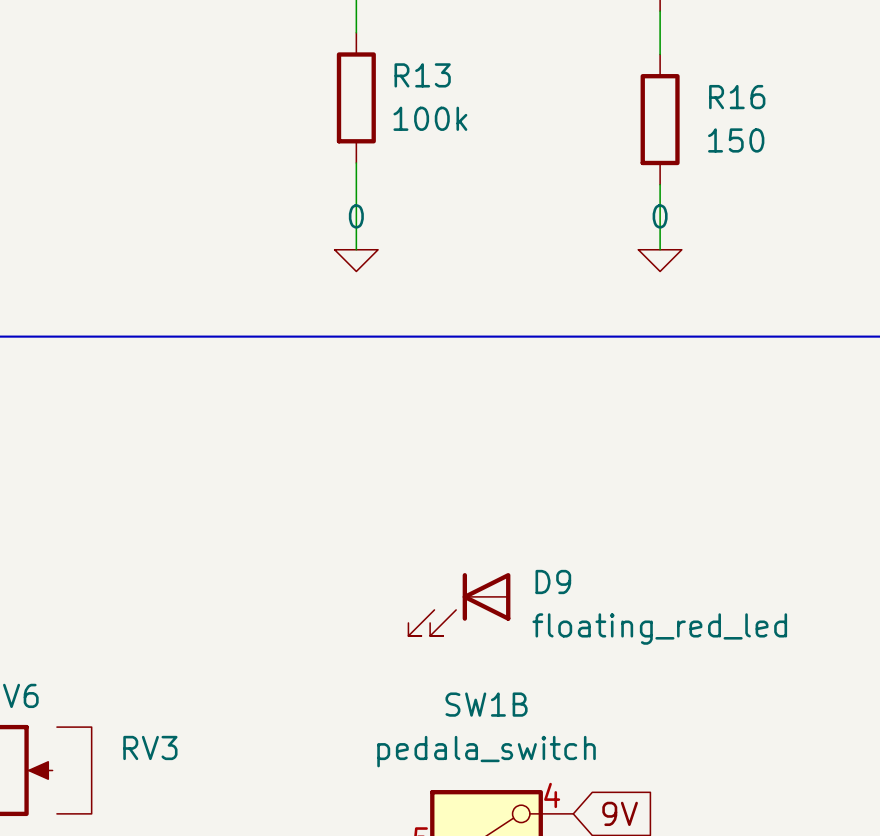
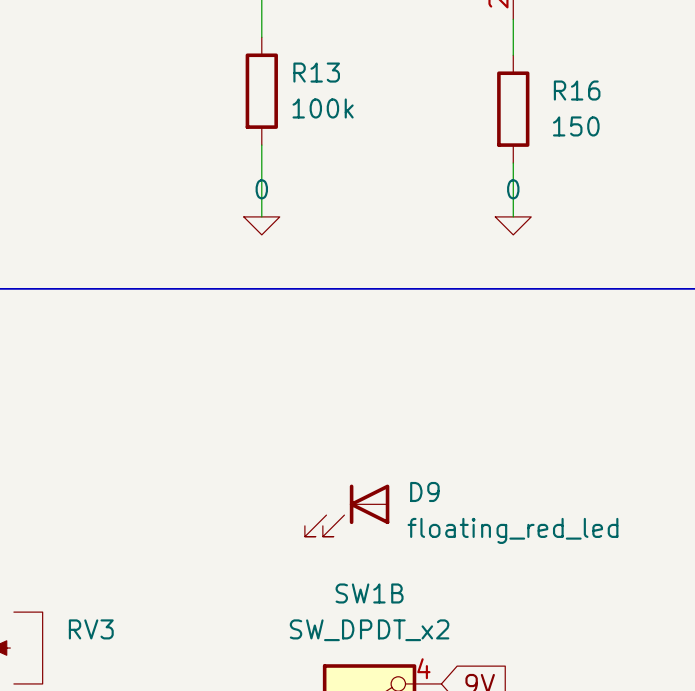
SW1B value: pedala_switch (486, 751) -> SW_DPDT_x2 (369, 630)

